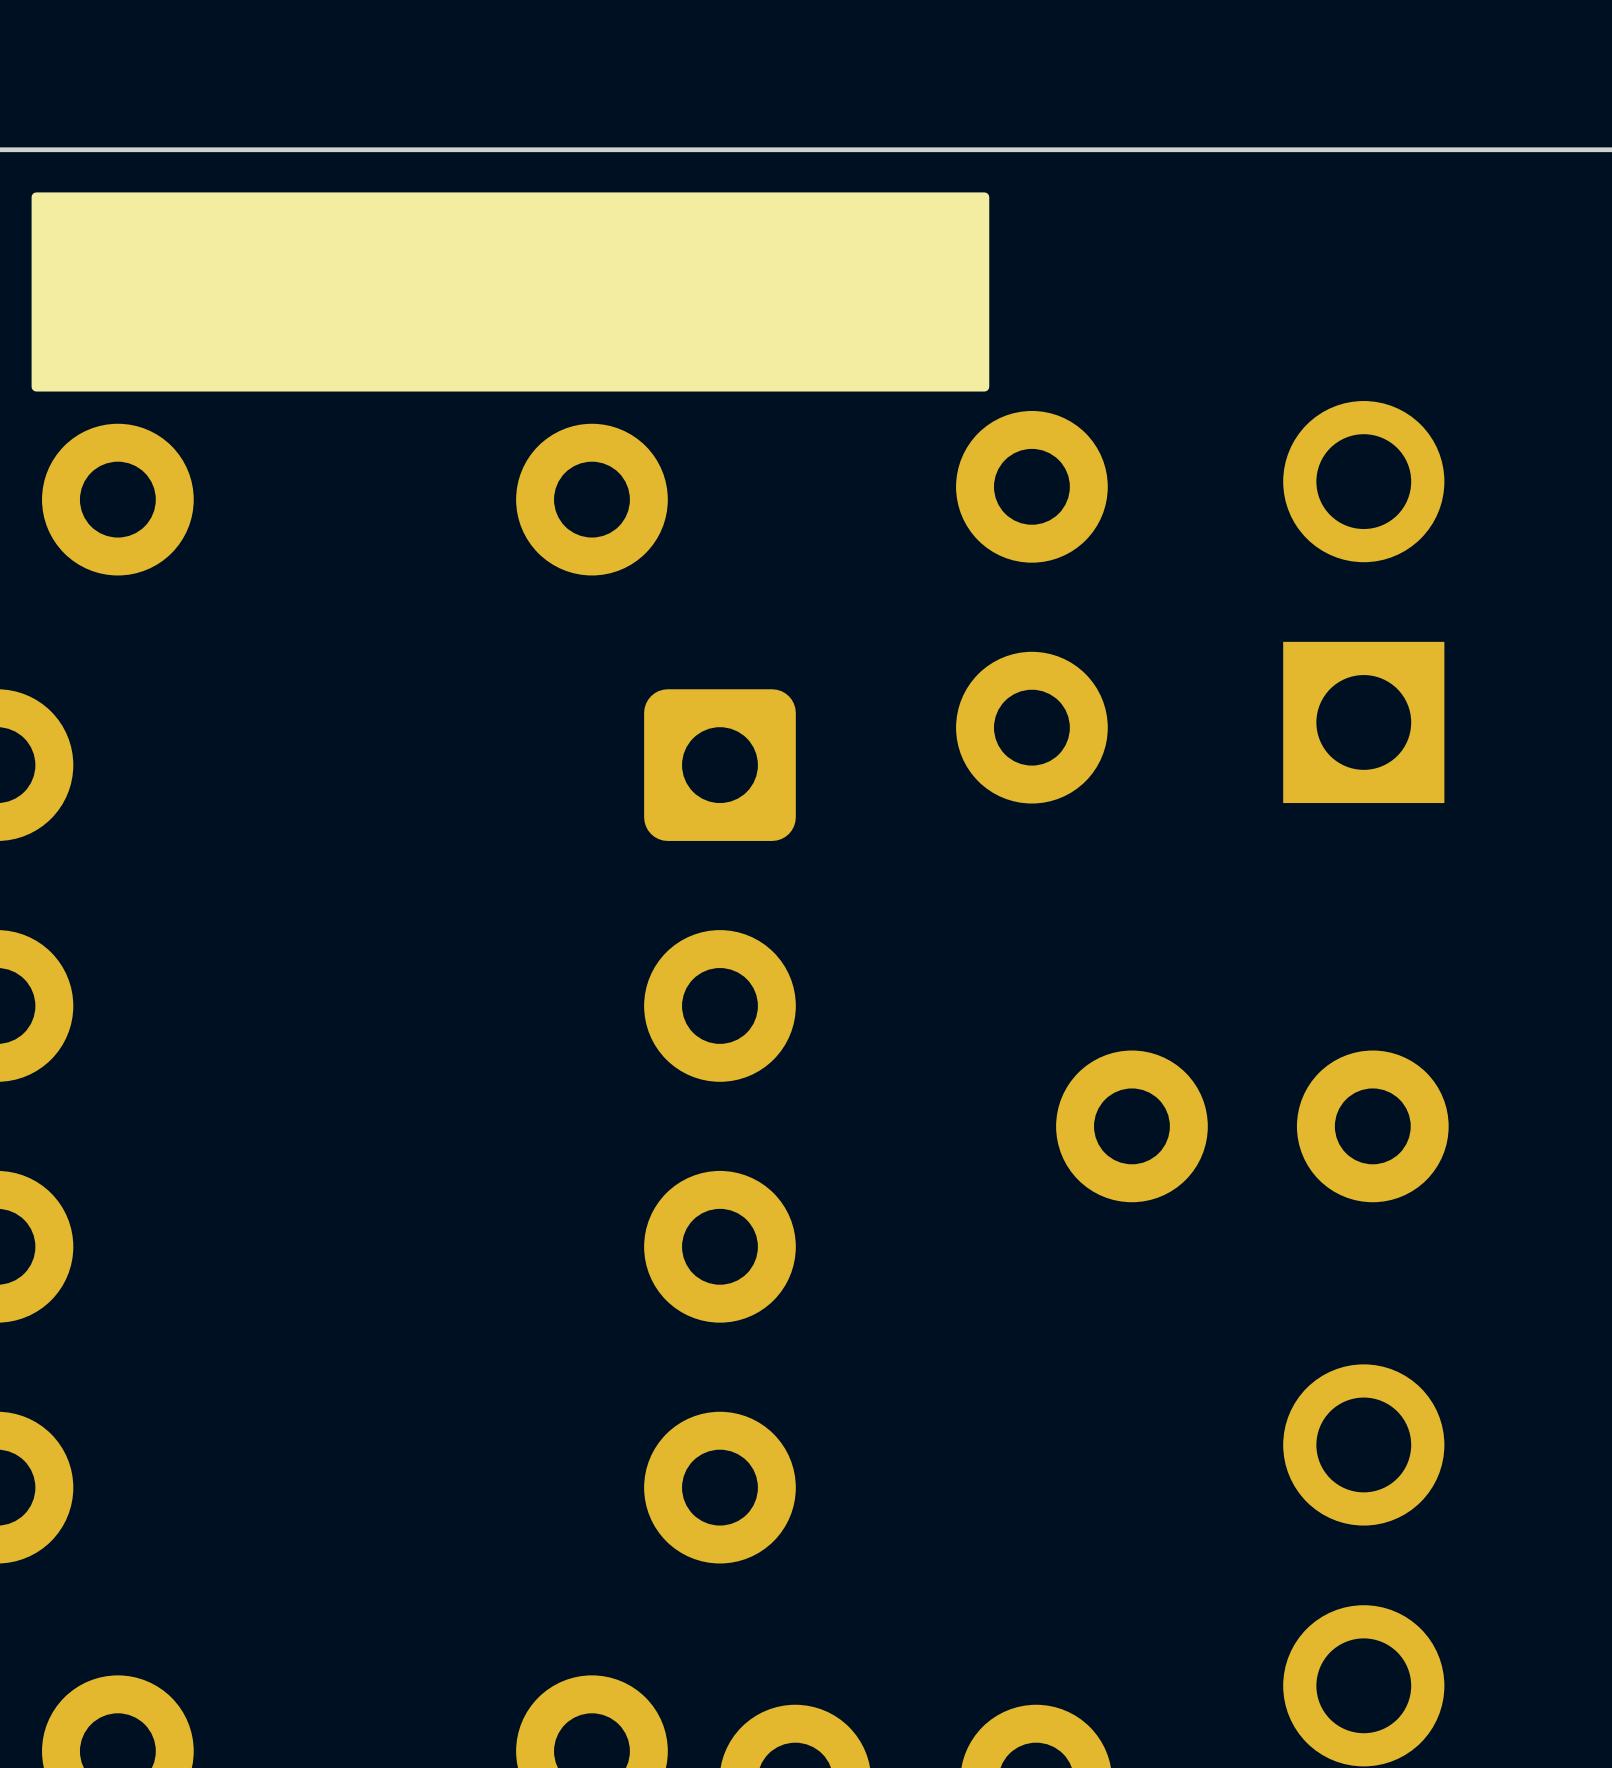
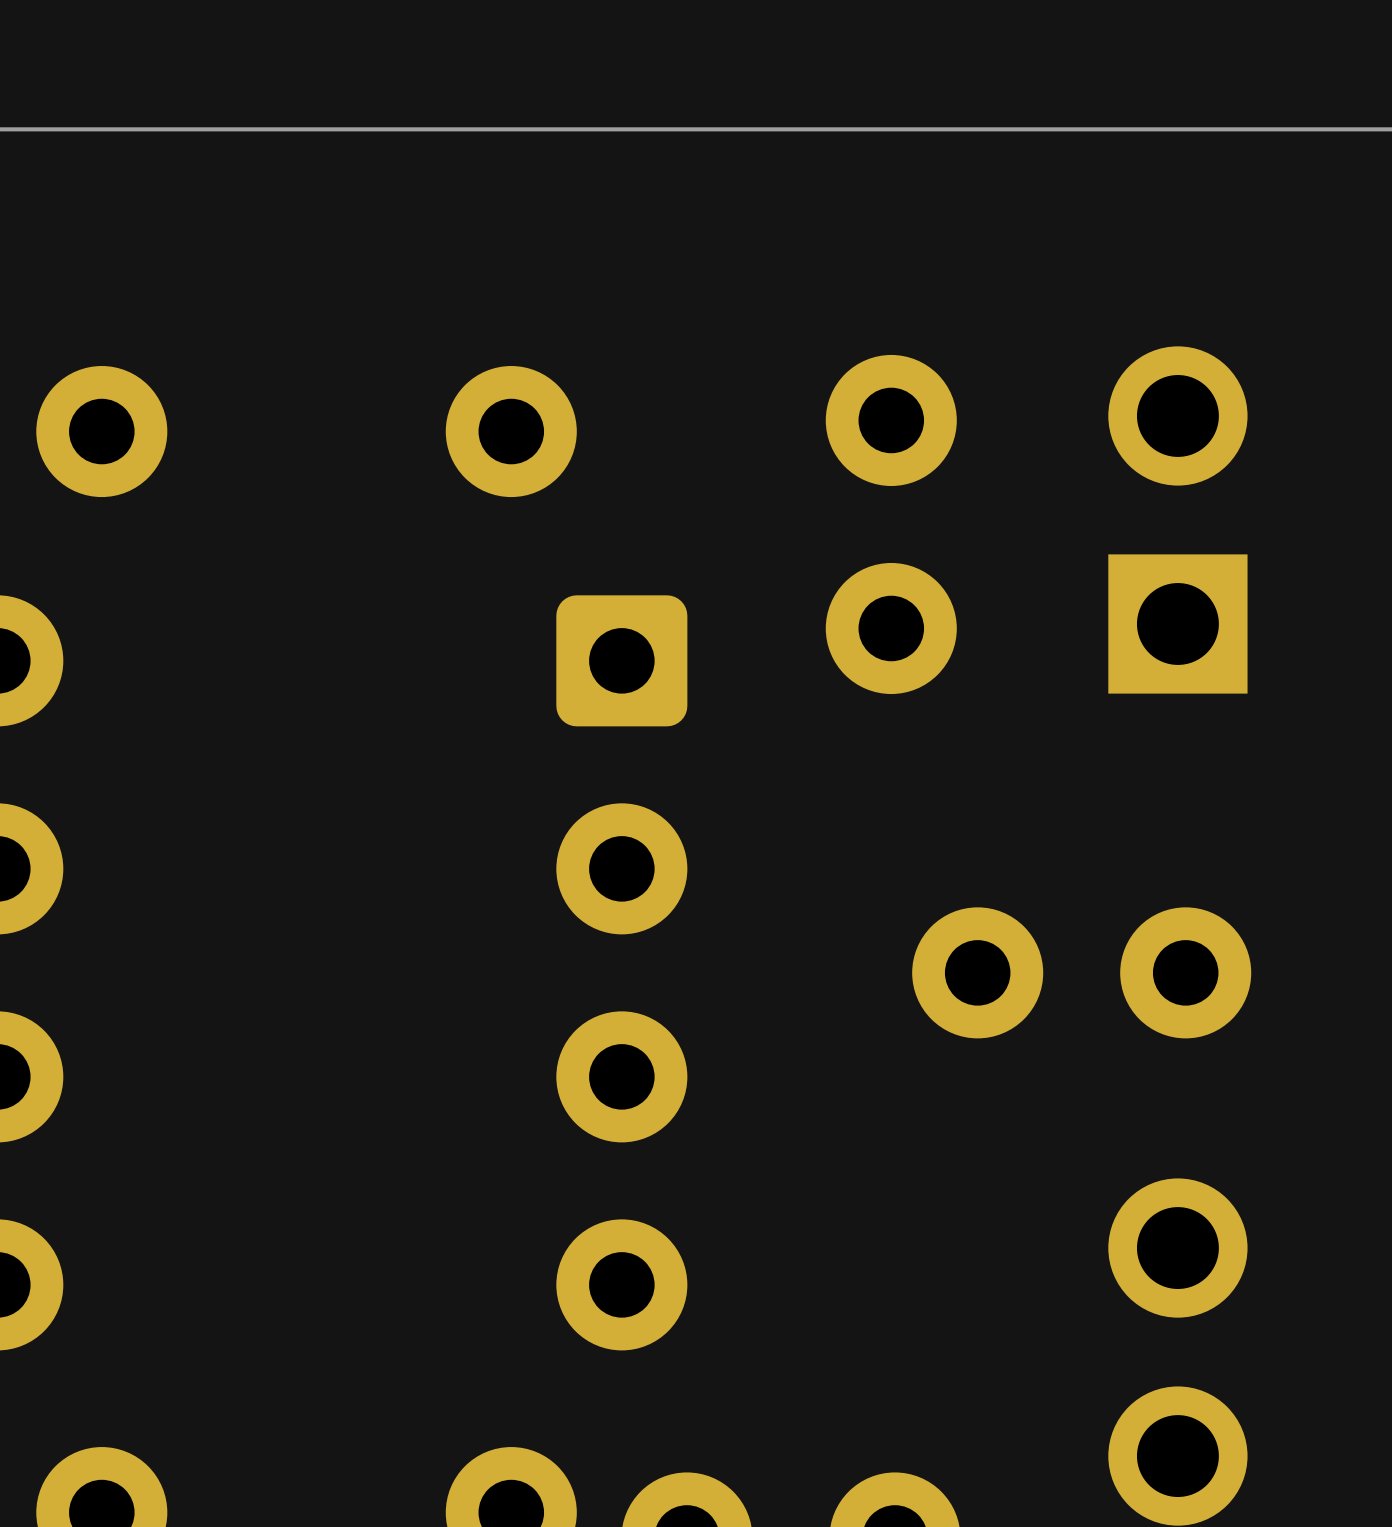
drawing: [31, 192, 990, 392] -> none

